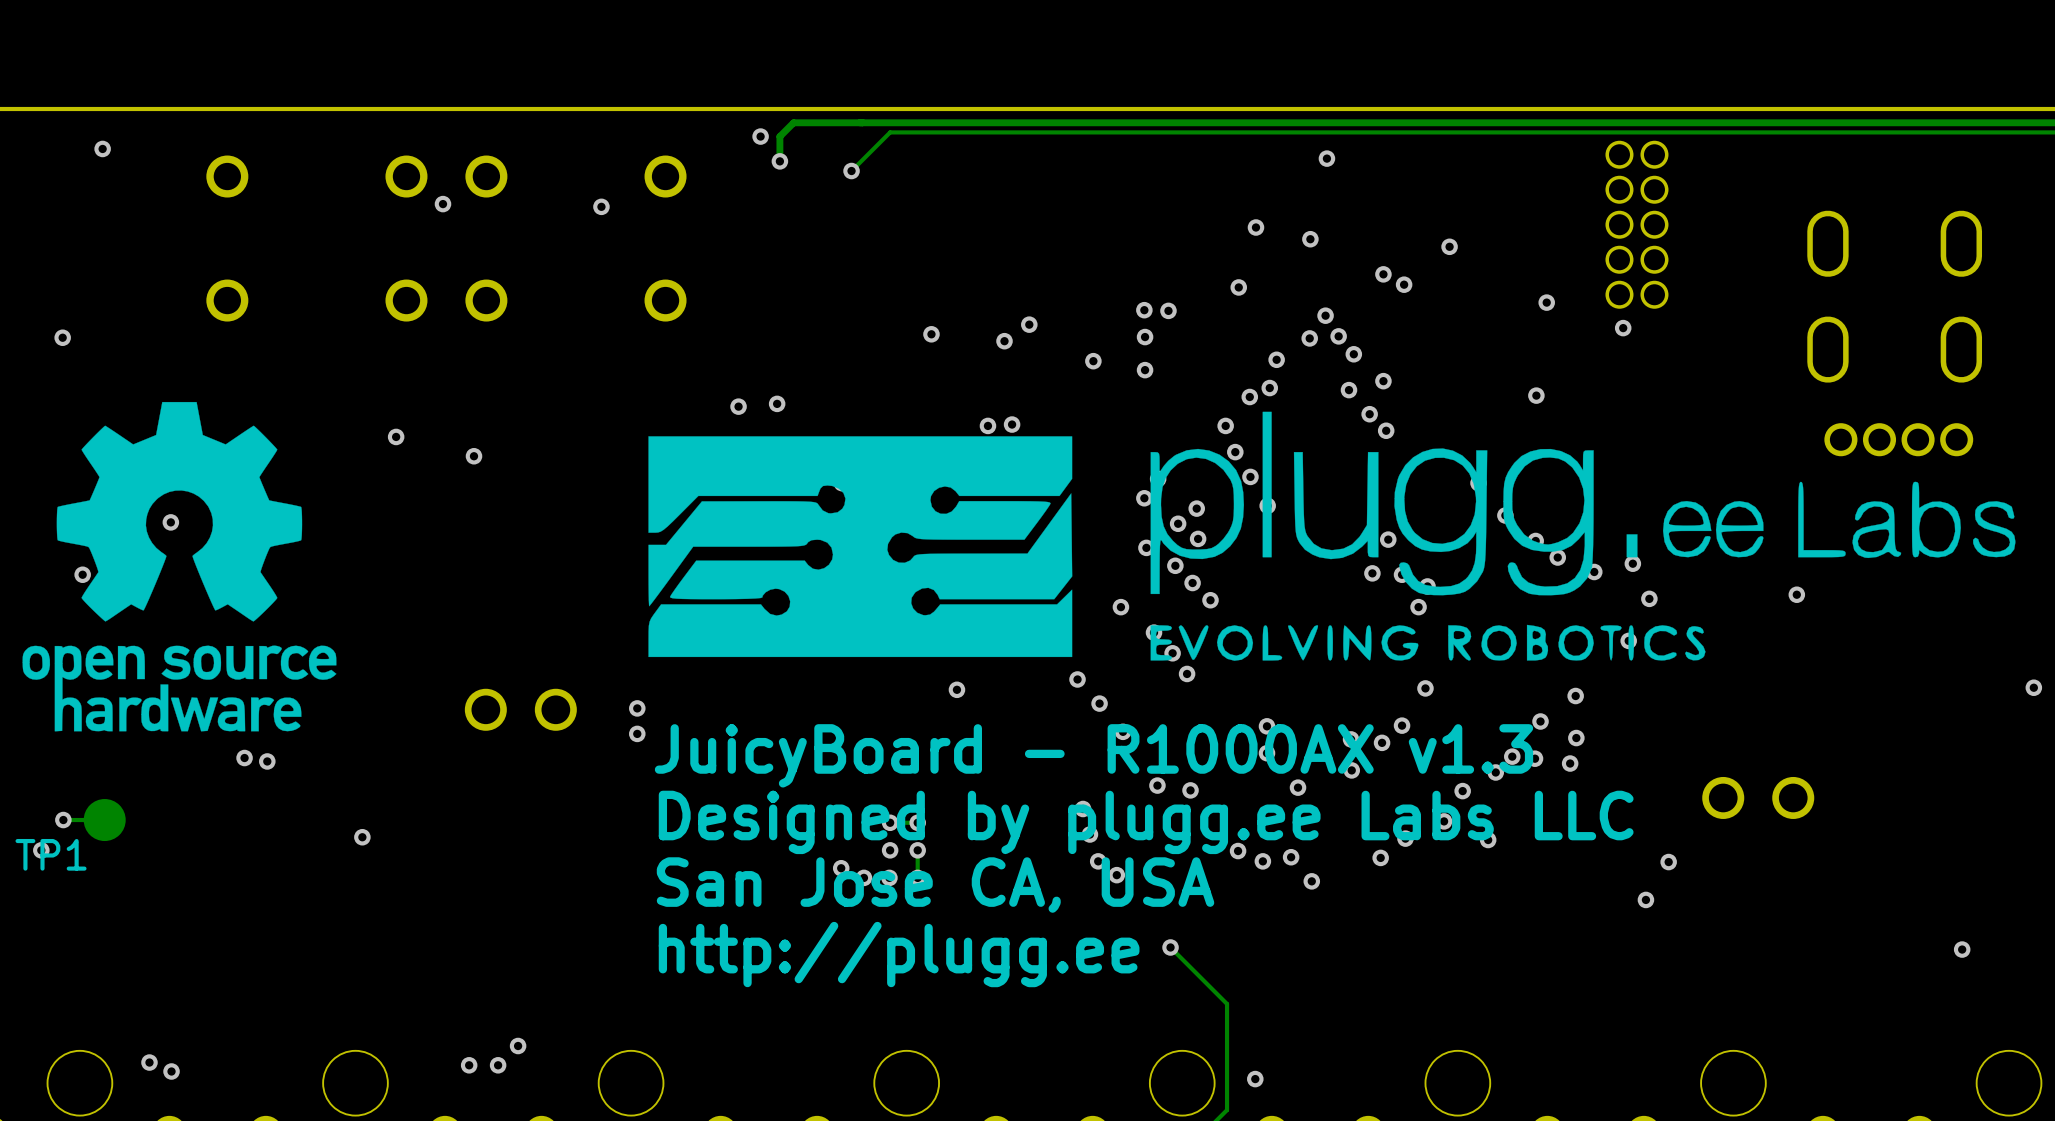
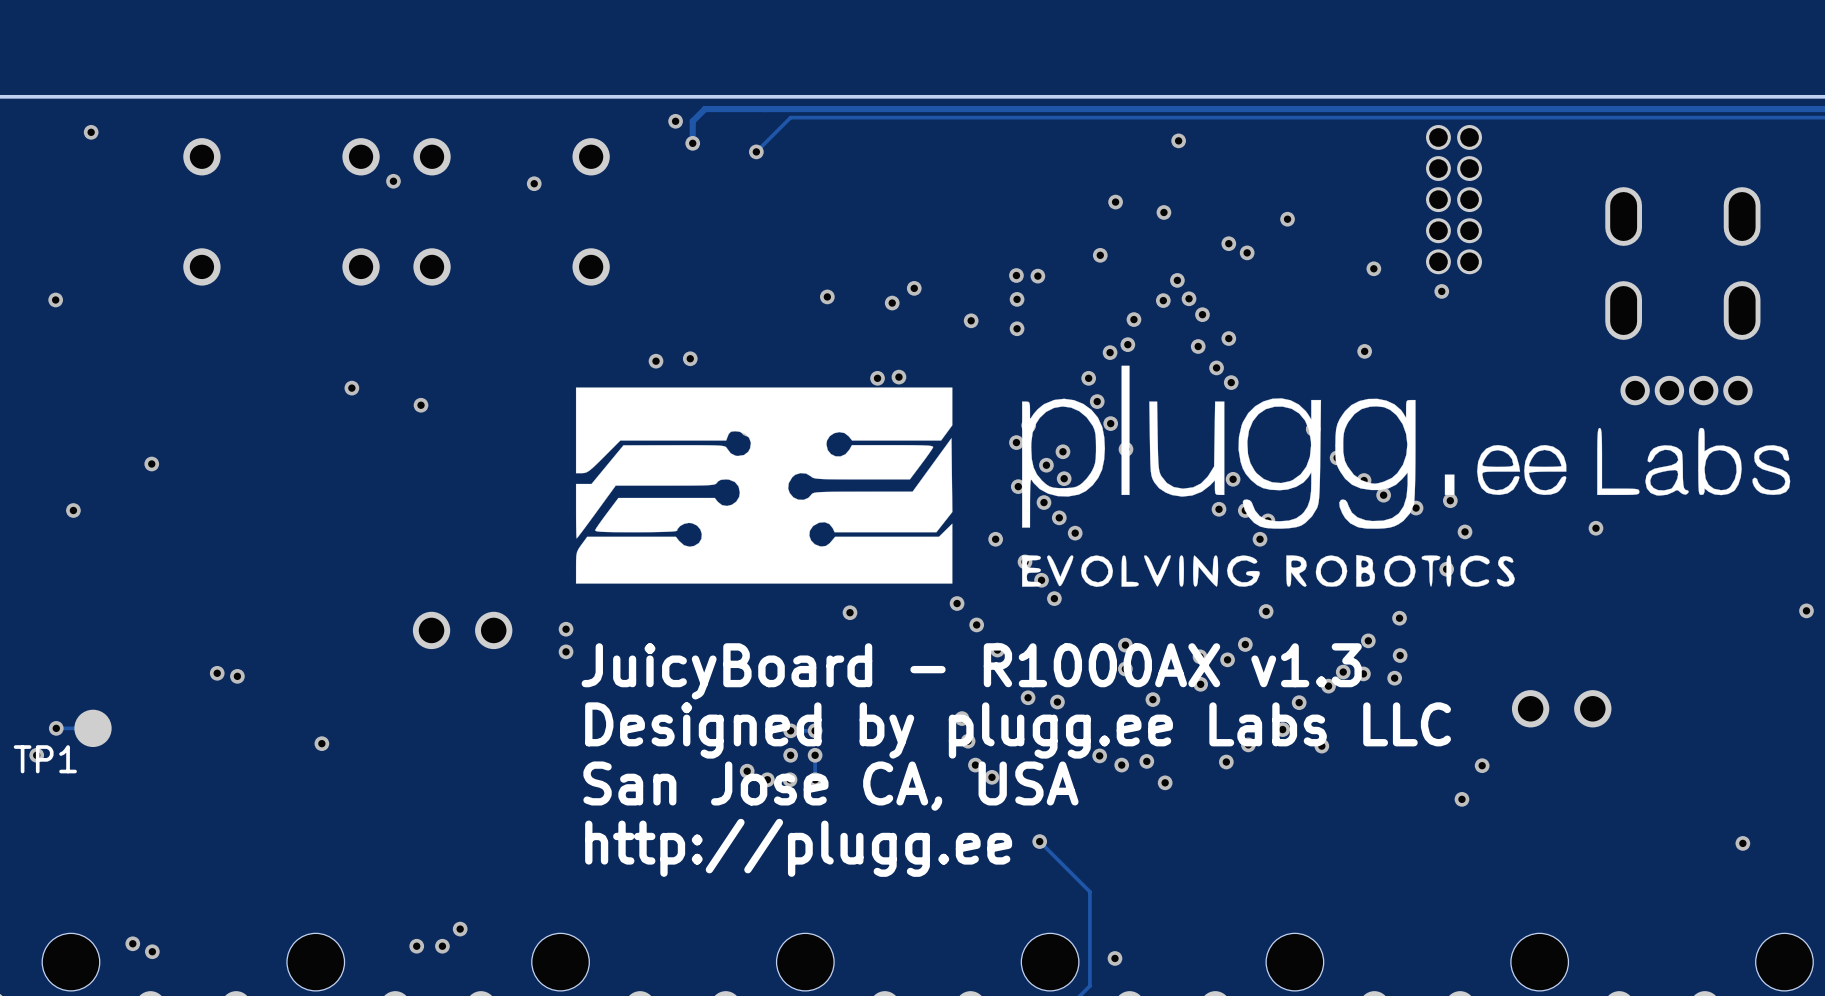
drawing: [22, 401, 337, 732] -> none

